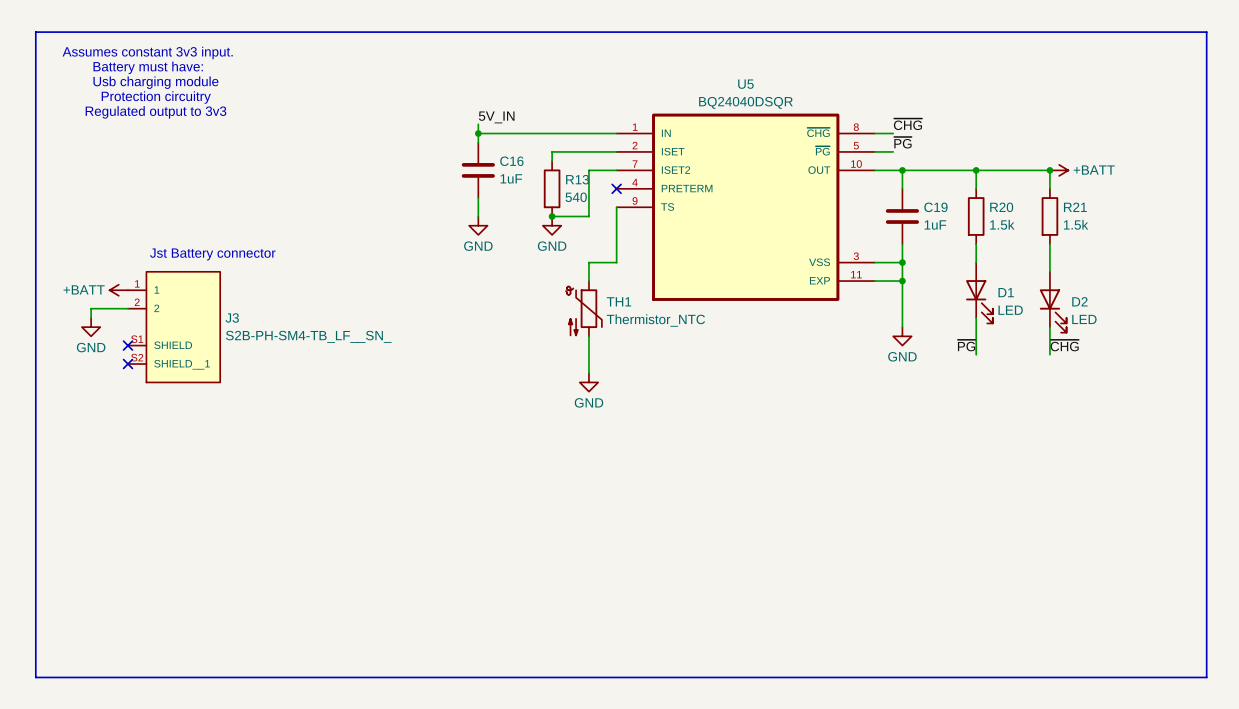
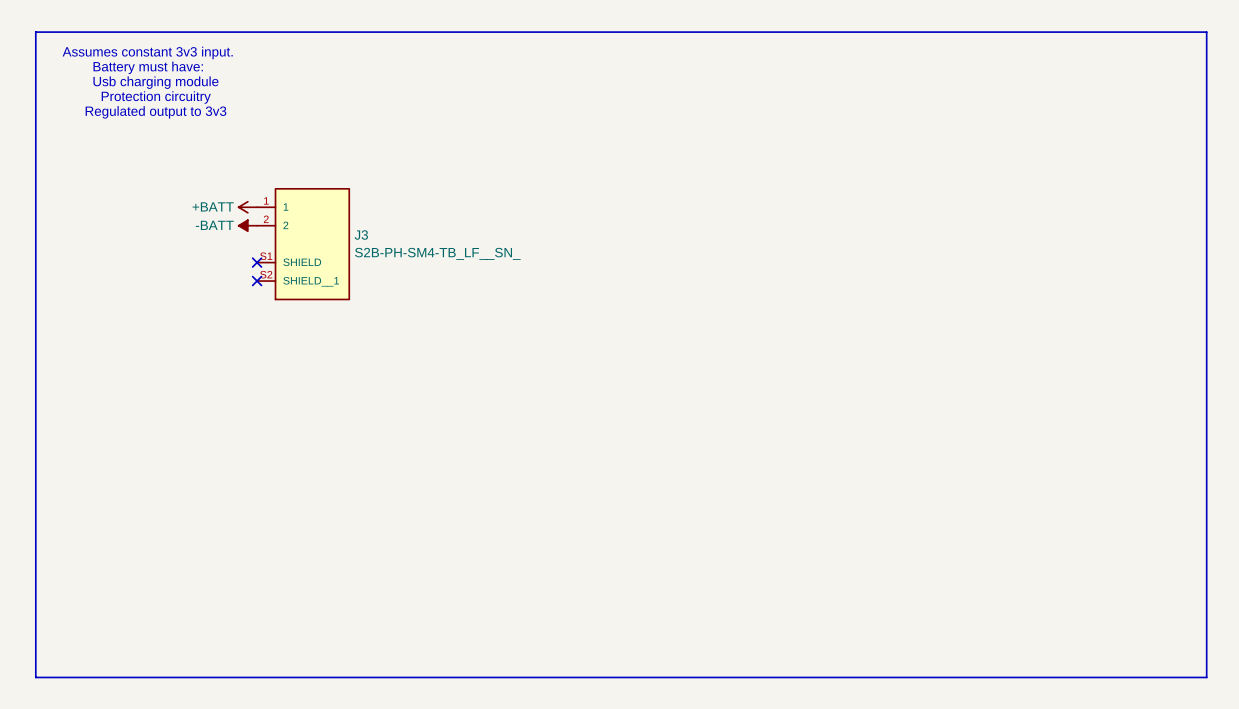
label: 5V_IN (496, 117) -> none
wire: (478, 124) (478, 142) -> none
label: ~{CHG} (907, 124) -> none
wire: (478, 133) (616, 133) -> none
junction: (478, 133) -> none
wire: (874, 133) (893, 133) -> none
label: ~{PG} (902, 142) -> none
wire: (616, 151) (552, 151) (552, 161) -> none
wire: (874, 151) (893, 151) -> none
C16: 1uF (478, 170) -> none
wire: (616, 170) (588, 170) (588, 216) (552, 216) -> none
wire: (874, 170) (1049, 170) (1049, 188) -> none
wire: (902, 170) (902, 188) -> none
junction: (902, 170) -> none
wire: (976, 170) (976, 188) -> none
junction: (976, 170) -> none
junction: (1049, 170) -> none
power symbol: +BATT (1059, 170) -> none
R13: 540 (552, 188) -> none
no-connect mark: (616, 188) -> none
wire: (478, 198) (478, 216) -> none
wire: (616, 207) (616, 262) (588, 262) (588, 281) -> none
U5: BQ24040DSQR (745, 207) -> none
junction: (552, 216) -> none
C19: 1uF (902, 216) -> none
R20: 1.5k (976, 216) -> none
R21: 1.5k (1049, 216) -> none
power symbol: none -> -BATT (247, 225)
power symbol: GND (478, 225) -> none
power symbol: GND (552, 225) -> none
wire: (902, 244) (902, 327) -> none
wire: (976, 244) (976, 262) -> none
wire: (1049, 244) (1049, 271) -> none
text: Jst Battery connector (212, 254) -> none
no-connect mark: none -> (257, 262)
wire: (874, 262) (902, 262) -> none
junction: (902, 262) -> none
no-connect mark: none -> (257, 281)
wire: (874, 281) (902, 281) -> none
junction: (902, 281) -> none
power symbol position: +BATT (118, 290) -> +BATT (247, 207)
D1: LED (979, 293) -> none
D2: LED (1053, 302) -> none
wire: (127, 308) (91, 308) (91, 317) -> none
TH1: Thermistor_NTC (583, 308) -> none
wire: (976, 317) (976, 354) -> none
power symbol: GND (91, 327) -> none
J3 position: (174, 327) -> (303, 244)
wire: (1049, 327) (1049, 354) -> none
wire: (588, 336) (588, 373) -> none
power symbol: GND (902, 336) -> none
no-connect mark: (127, 345) -> none
label: ~{PG} (966, 345) -> none
label: ~{CHG} (1064, 345) -> none
no-connect mark: (127, 364) -> none
power symbol: GND (588, 382) -> none

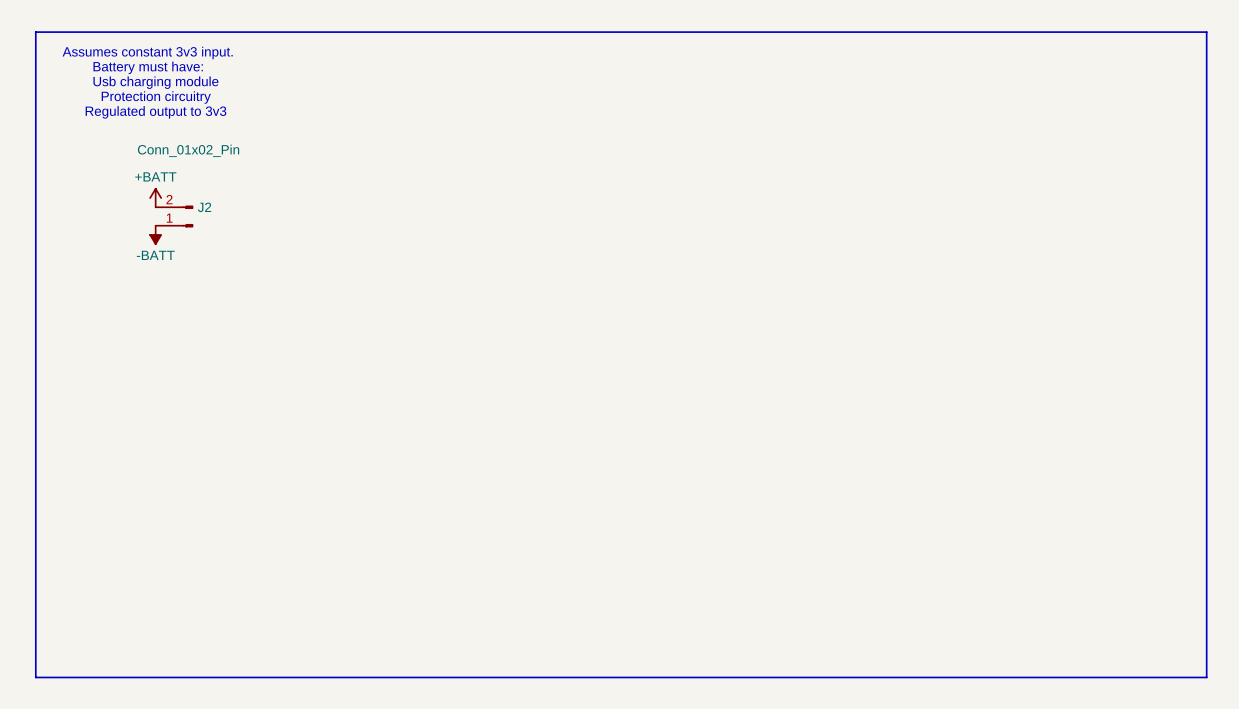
power symbol text position: +BATT (213, 206) -> +BATT (155, 176)
power symbol rotation: 0° (247, 207) -> 90° clockwise (155, 198)
power symbol position: +BATT (247, 207) -> +BATT (155, 198)
J2: none -> Conn_01x02_Pin (174, 216)
power symbol text position: -BATT (214, 225) -> -BATT (155, 255)
power symbol rotation: 0° (247, 225) -> 90° counterclockwise (155, 234)
power symbol position: -BATT (247, 225) -> -BATT (155, 234)
J3: S2B-PH-SM4-TB_LF__SN_ (303, 244) -> none
no-connect mark: (257, 262) -> none
no-connect mark: (257, 281) -> none

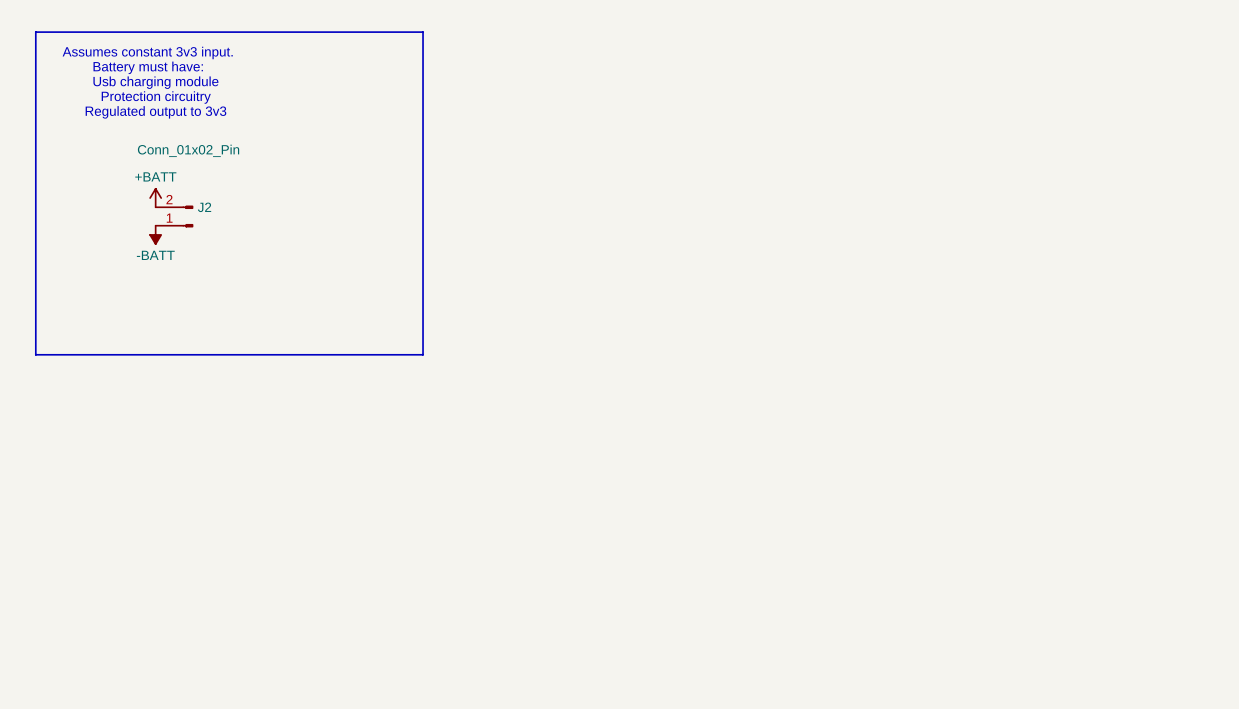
line: (423, 32) (1206, 32) (1206, 677) (35, 677) (35, 354) -> (423, 32) (423, 354) (35, 354)

